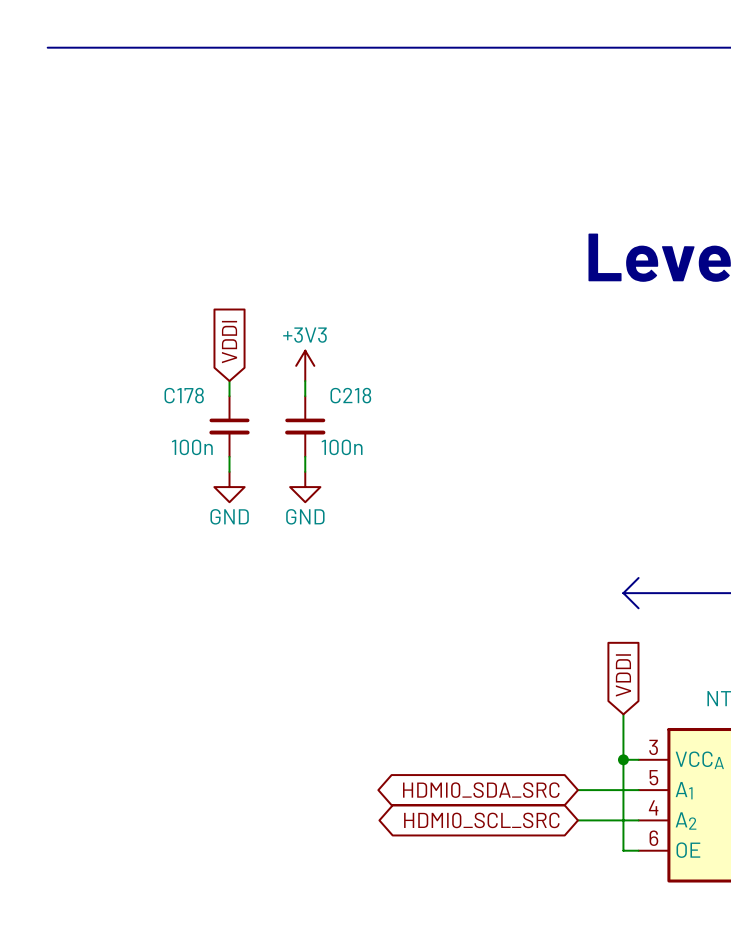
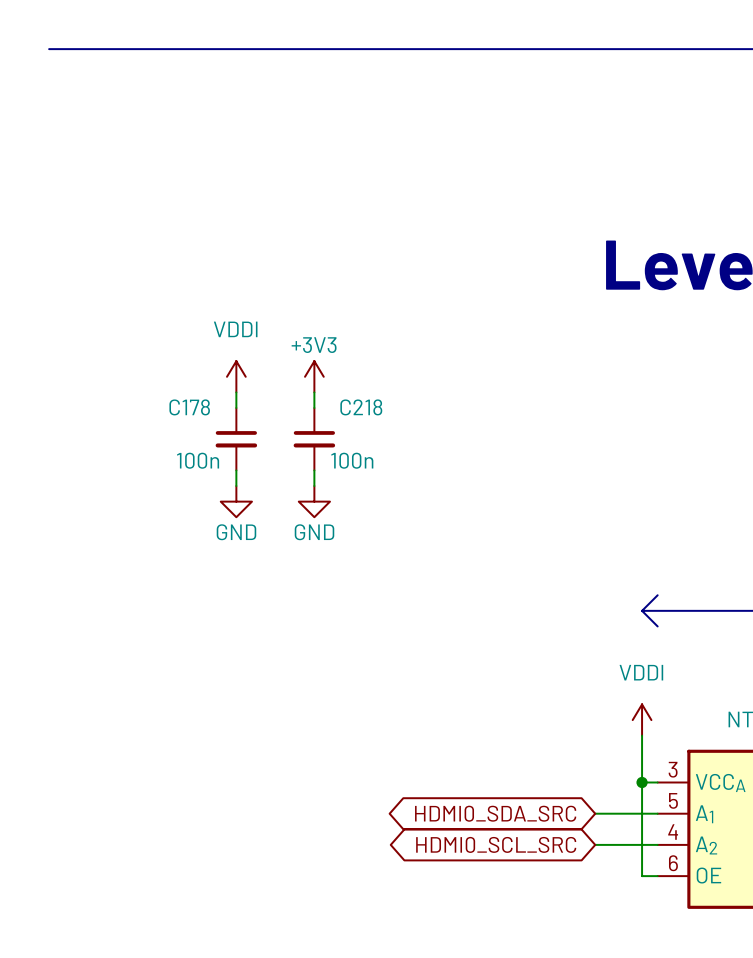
global label: VDDI (229, 342) -> none
power symbol: none -> VDDI (236, 376)
global label: VDDI (623, 675) -> none
power symbol: none -> VDDI (642, 720)

